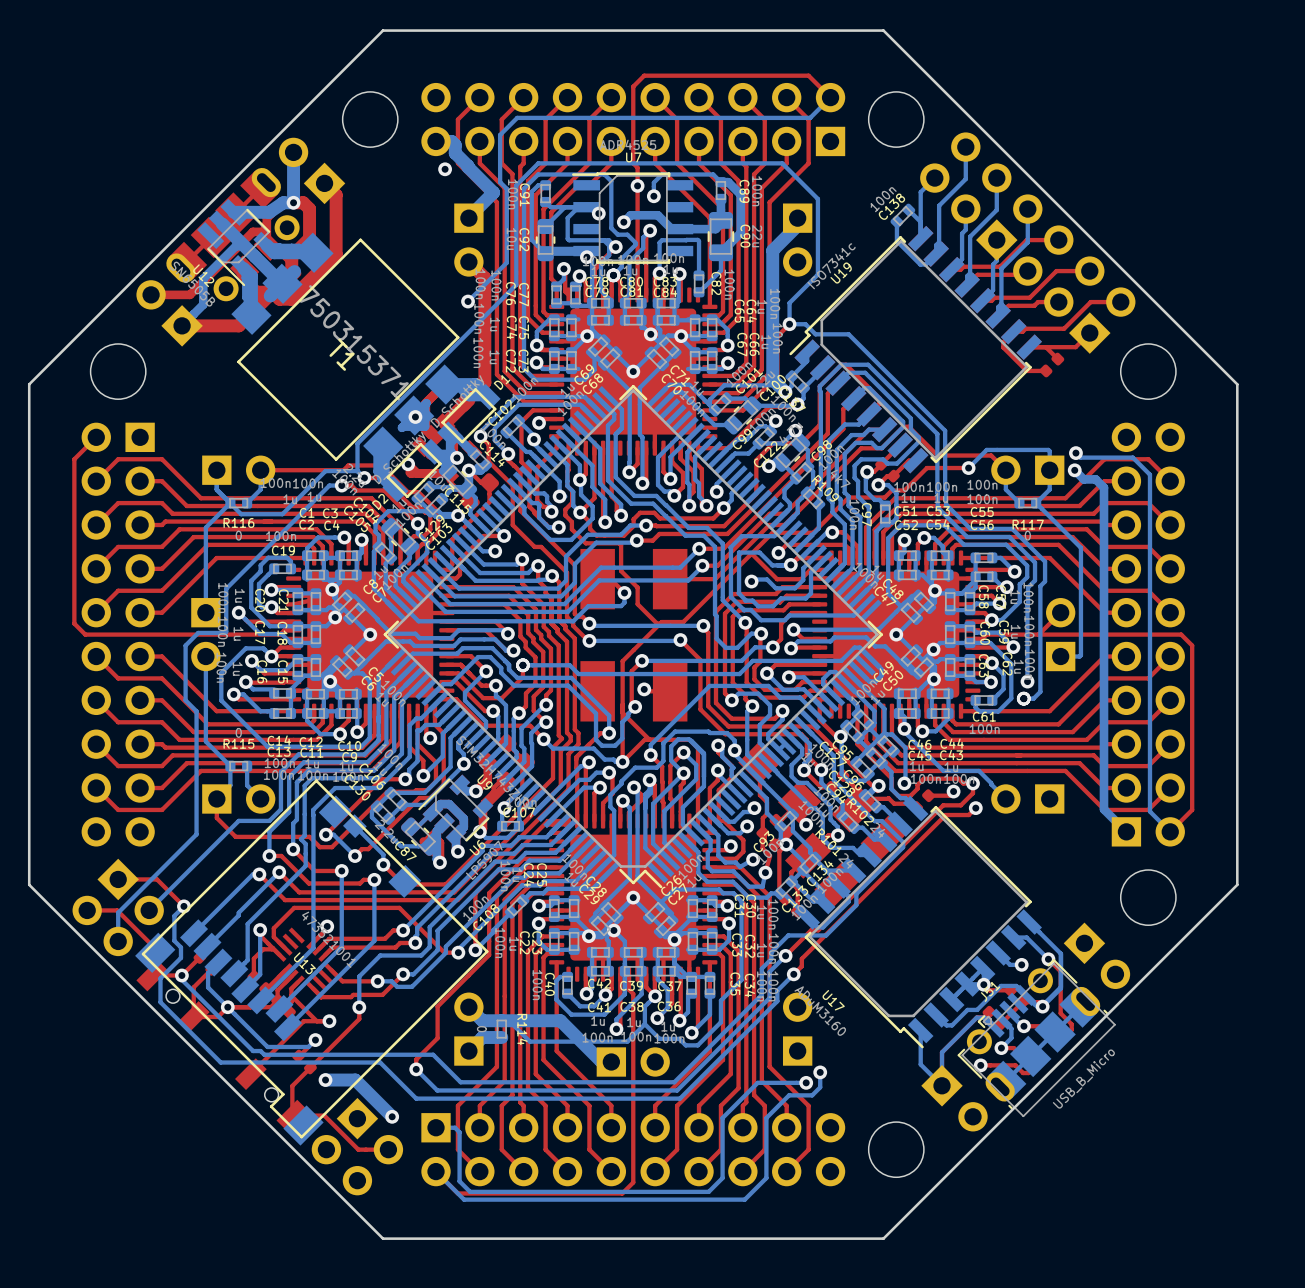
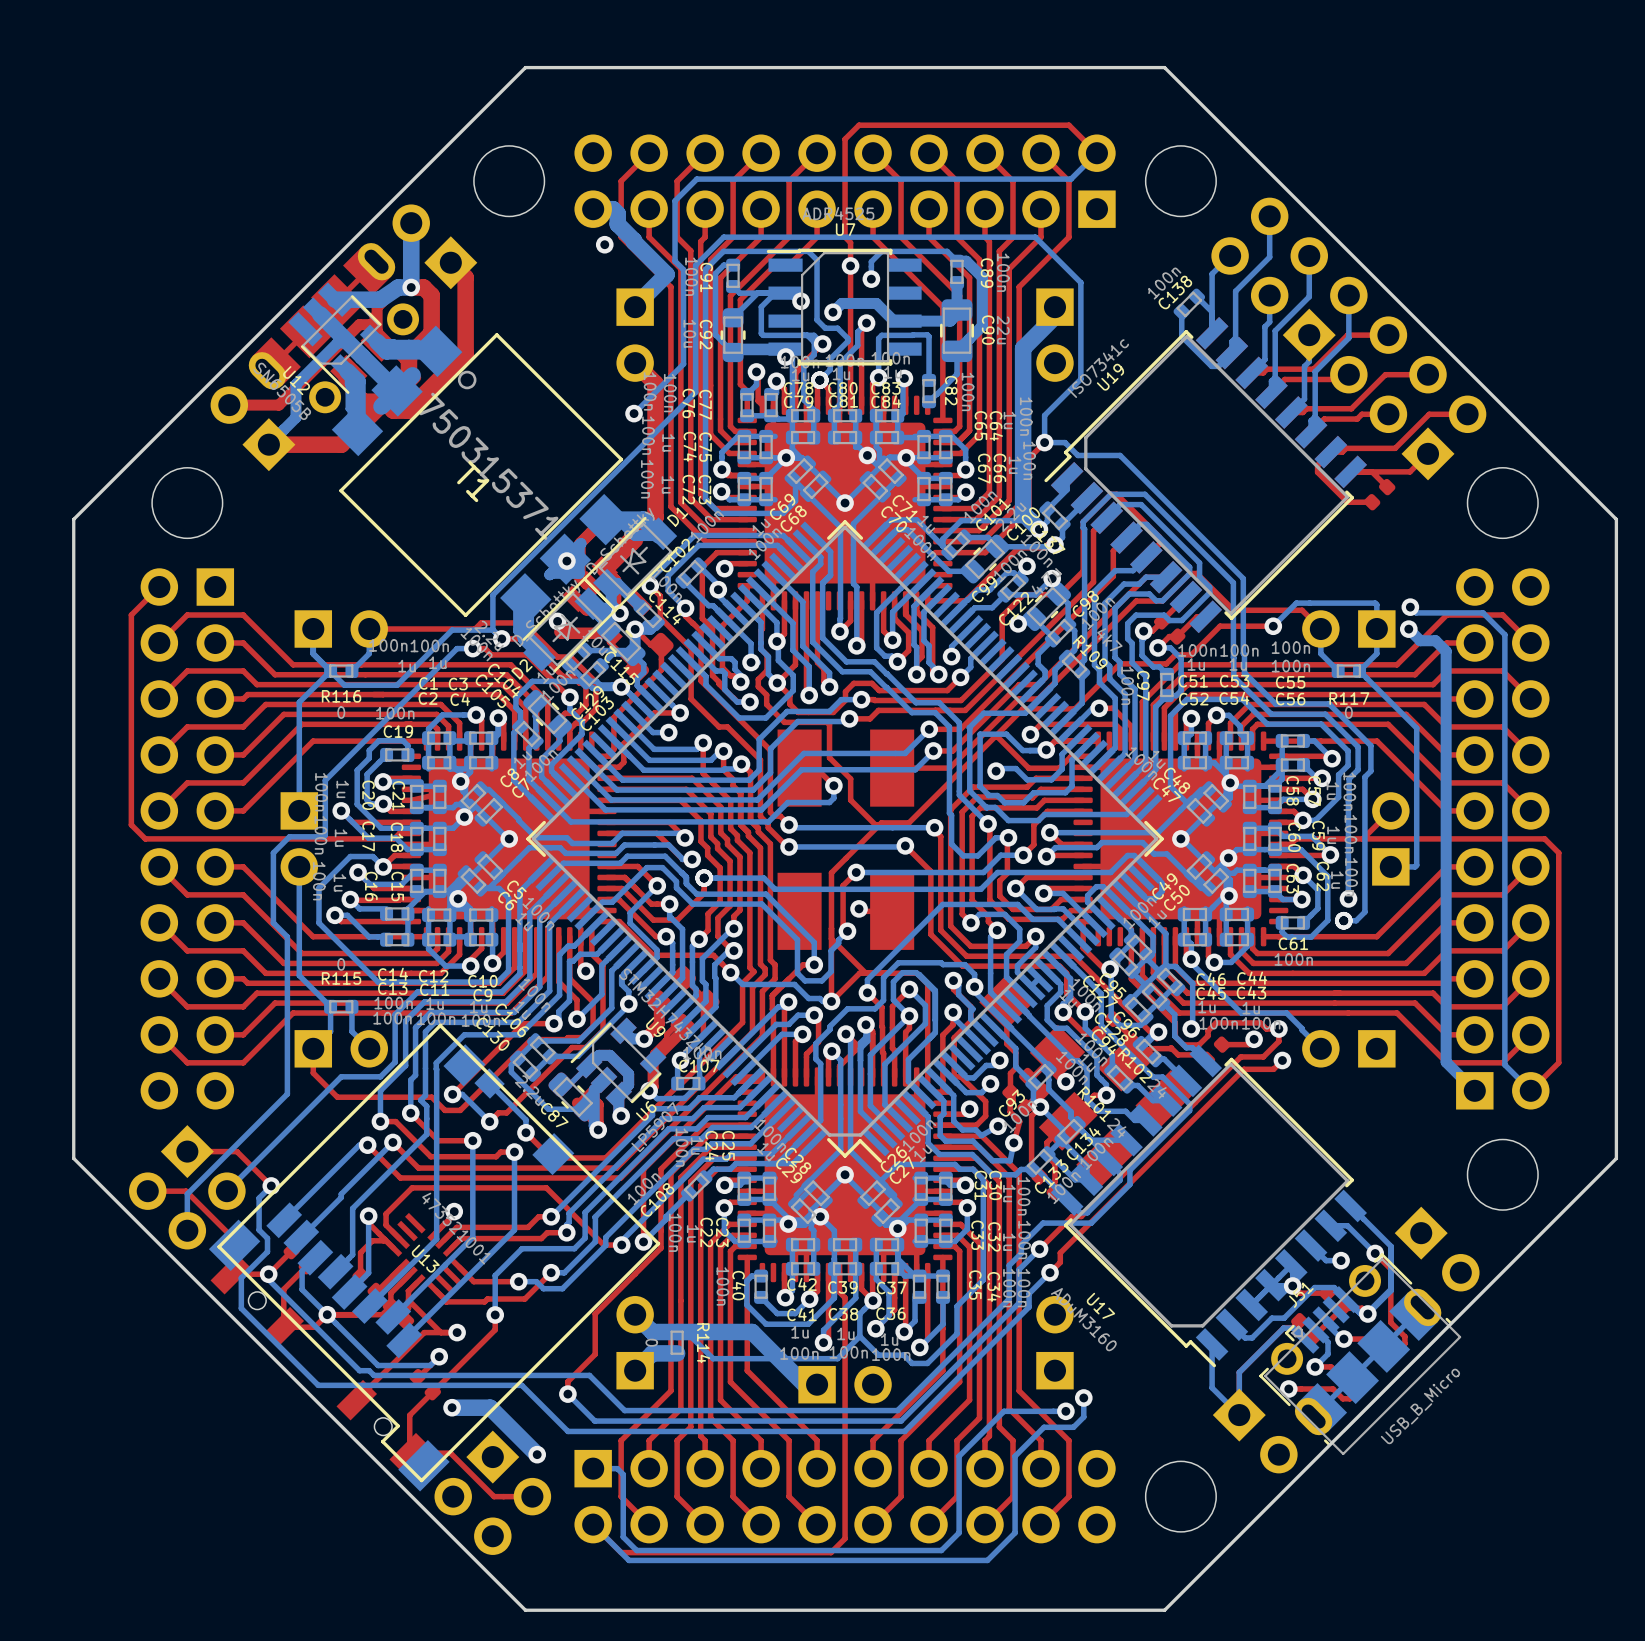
T1 footprint: [231, 232, 466, 467] -> [331, 325, 631, 625]
D1 footprint: [437, 384, 501, 448] -> [583, 516, 678, 612]
D2 footprint: [382, 438, 446, 503] -> [522, 577, 618, 673]

